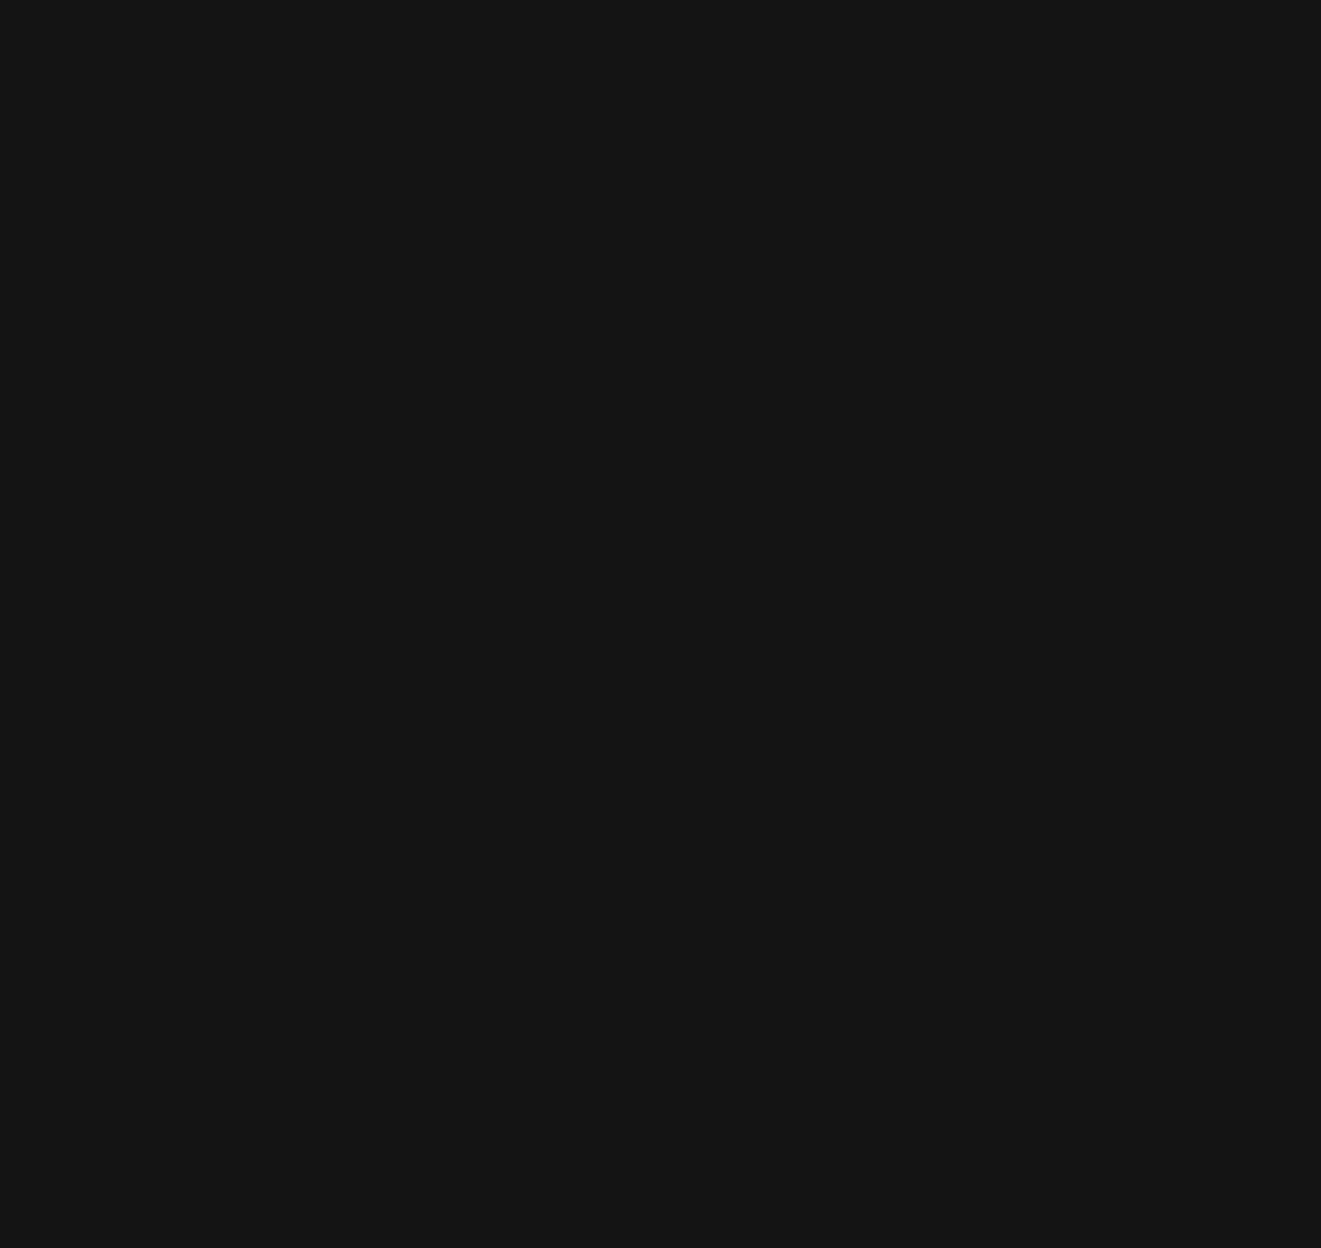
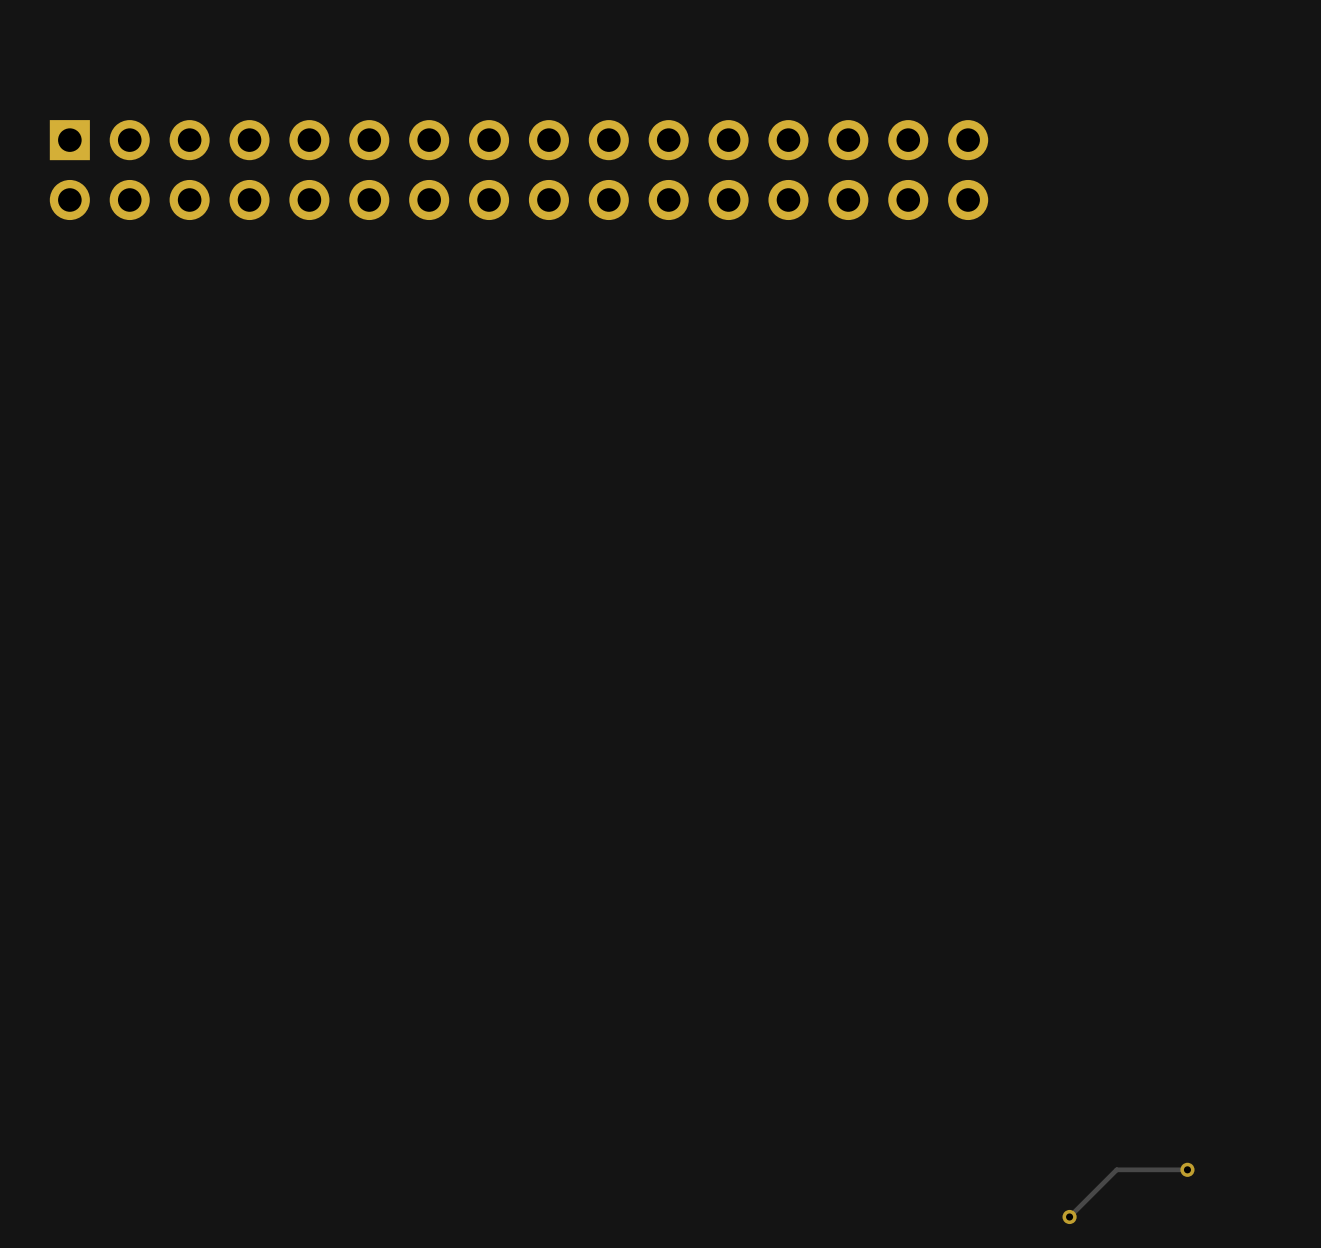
part: none -> (519, 170)
track: none -> (1187, 1169) (1116, 1169) (1069, 1216)
via: none -> (1187, 1169)
via: none -> (1069, 1216)

